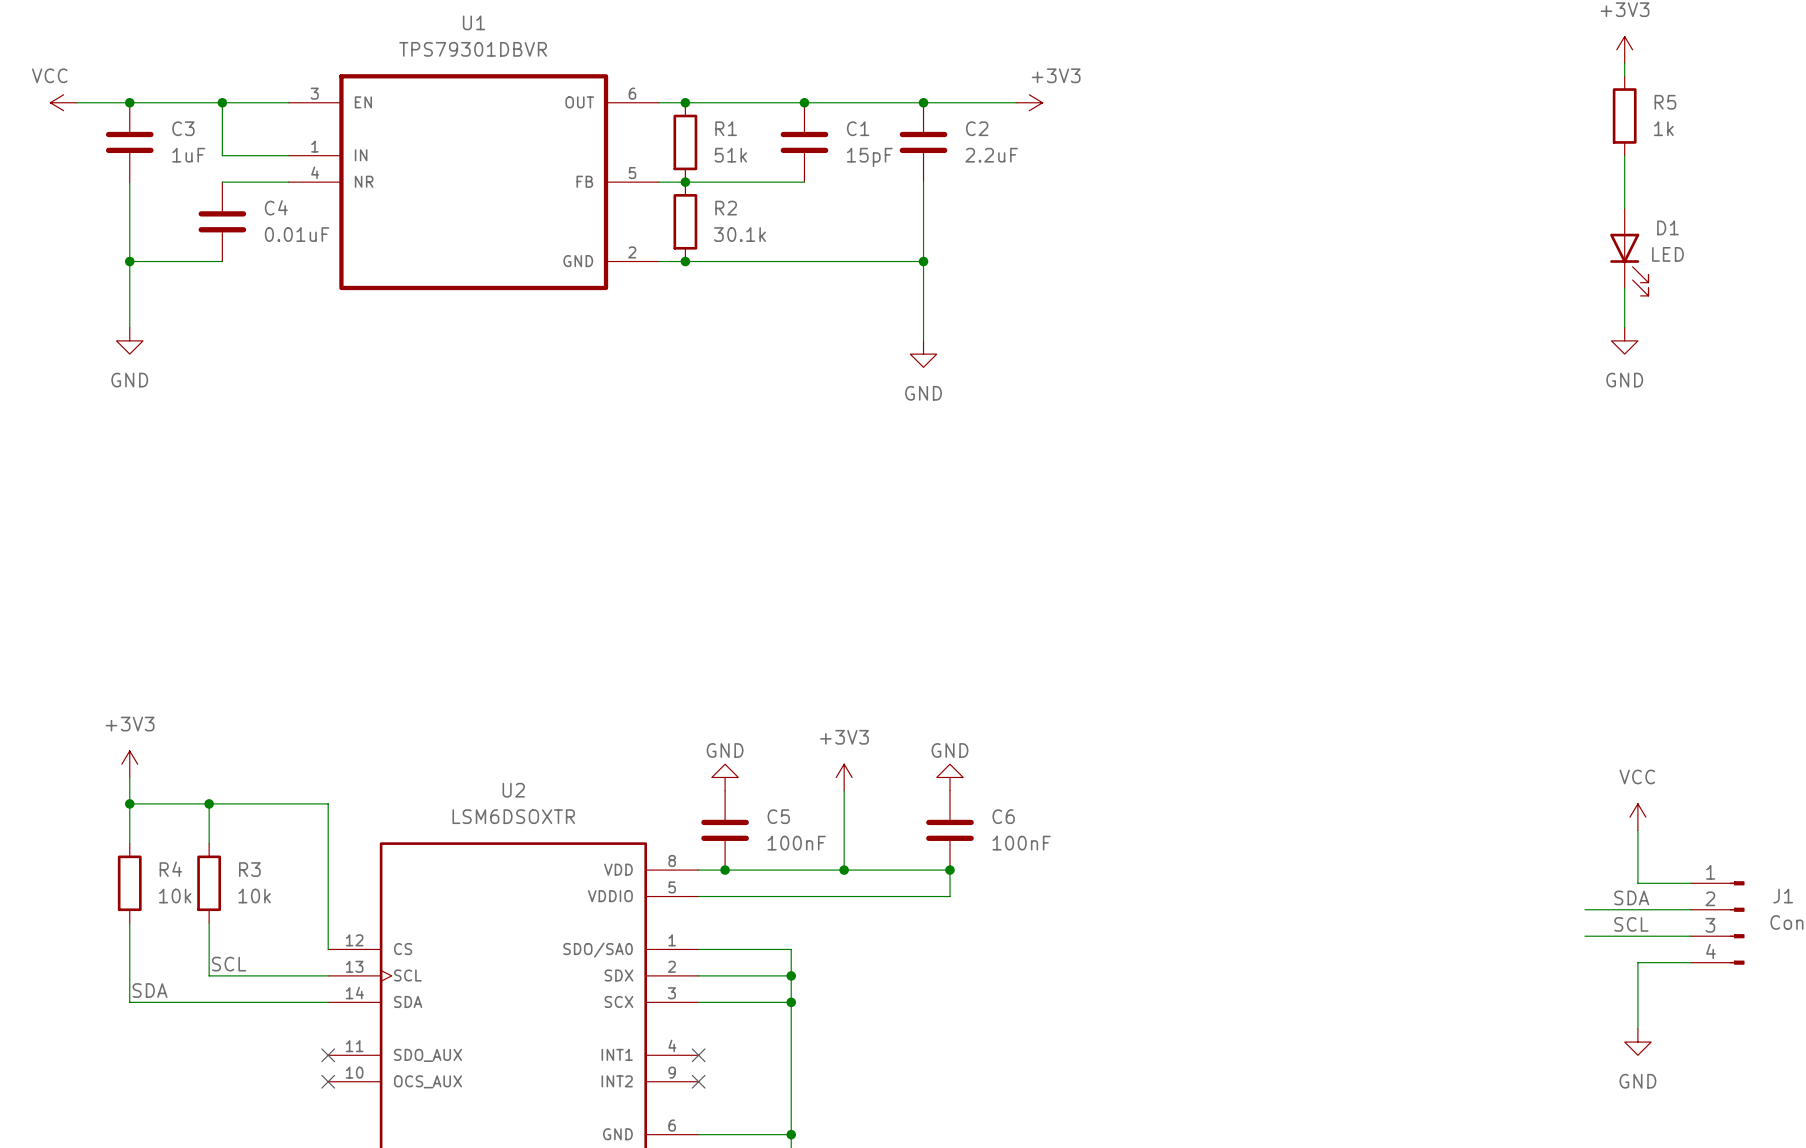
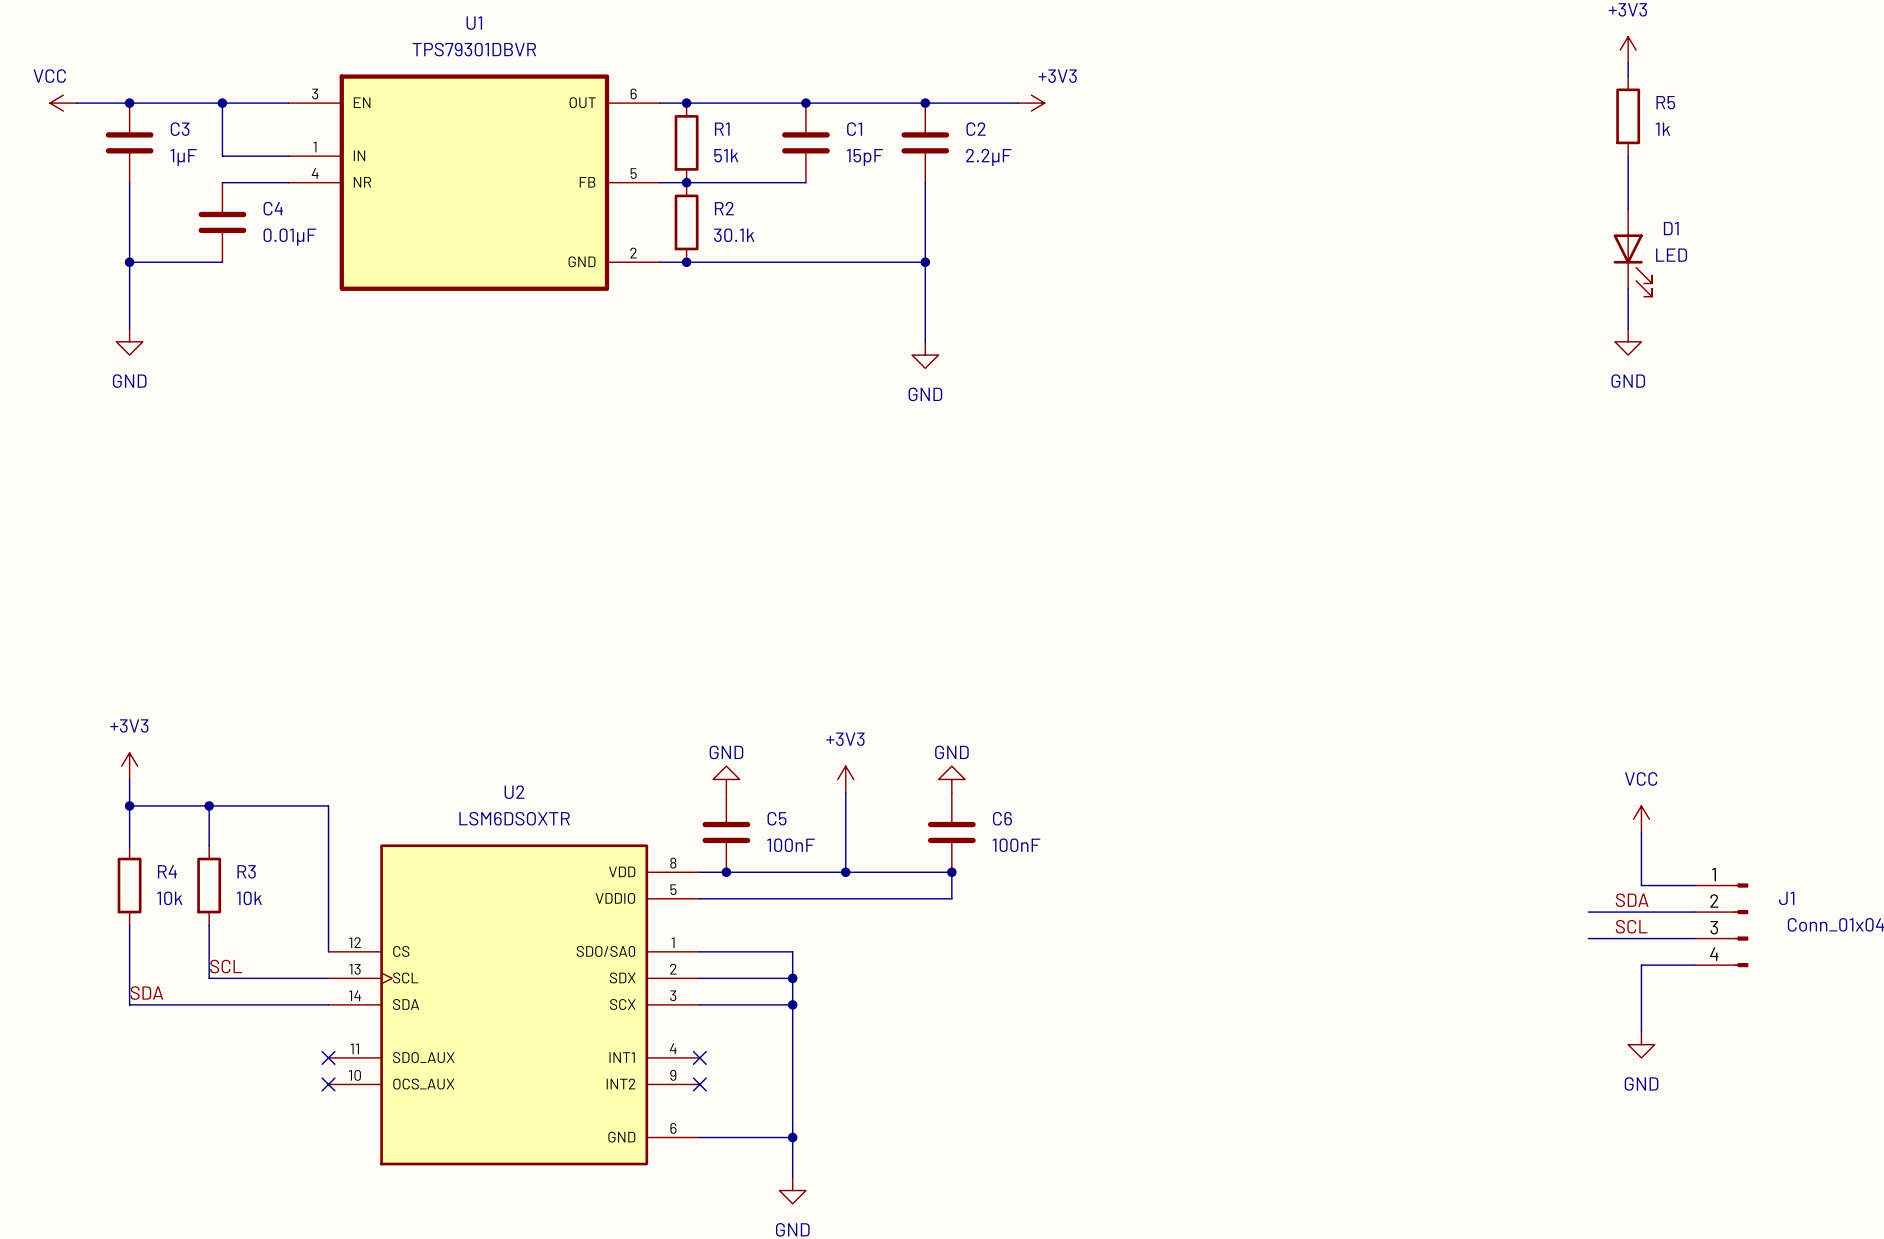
C3 value: 1uF (188, 155) -> 1µF (183, 157)
C2 value: 2.2uF (991, 155) -> 2.2µF (988, 157)
C4 value: 0.01uF (297, 234) -> 0.01µF (289, 237)

